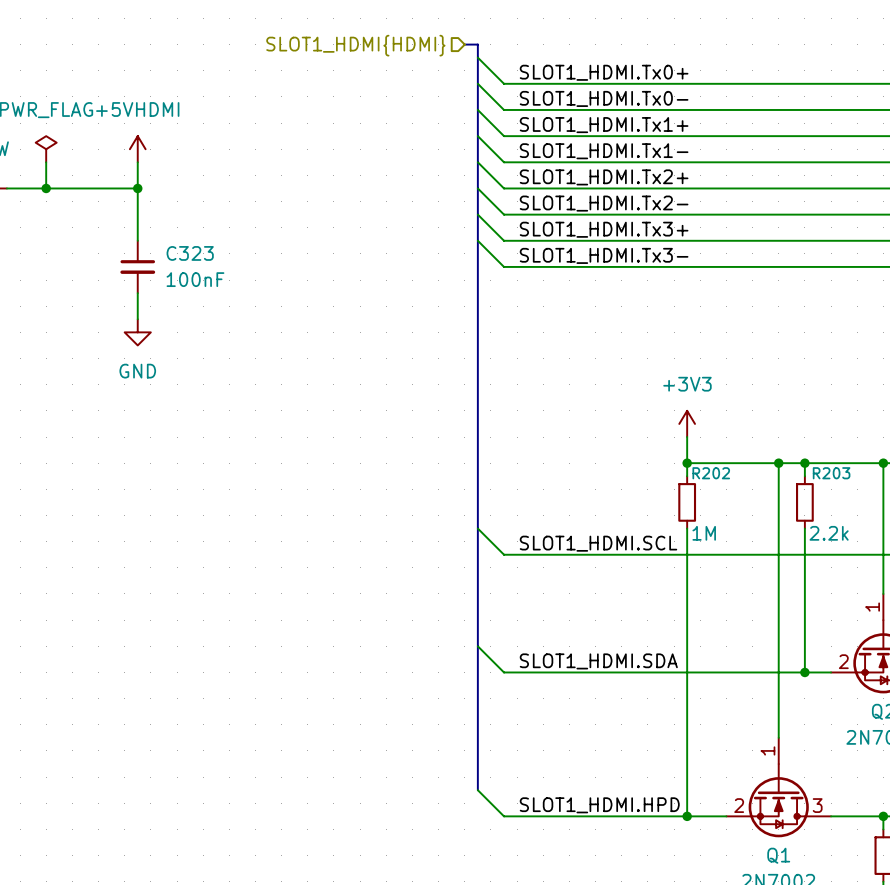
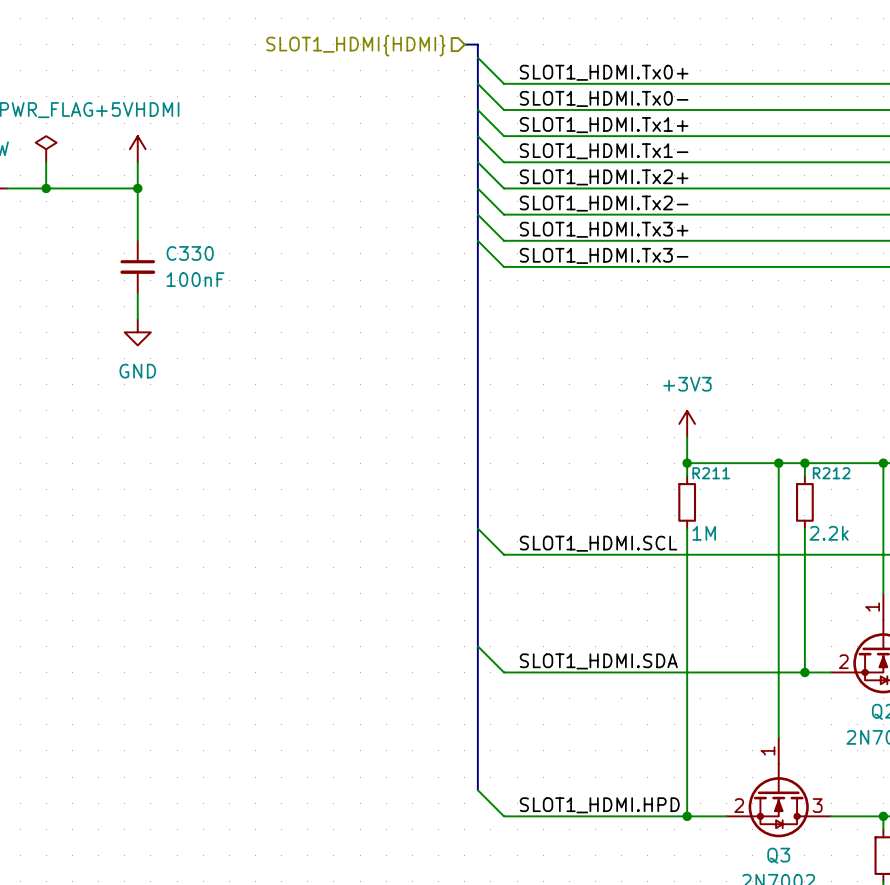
C323 name: C323 (190, 253) -> C330 (190, 253)
R202 name: R202 (711, 473) -> R211 (711, 473)
R203 name: R203 (831, 473) -> R212 (831, 473)
Q1 name: Q1 (778, 855) -> Q3 (778, 855)

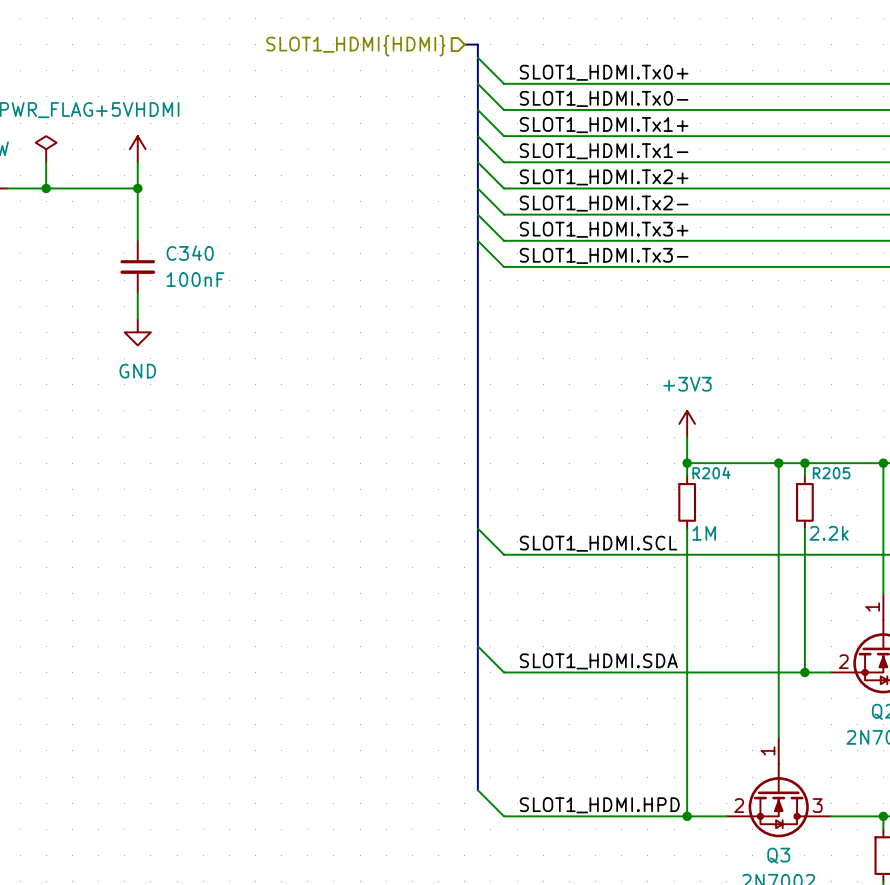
C330 name: C330 (190, 253) -> C340 (190, 253)
R211 name: R211 (711, 473) -> R204 (711, 472)
R212 name: R212 (831, 473) -> R205 (831, 473)

